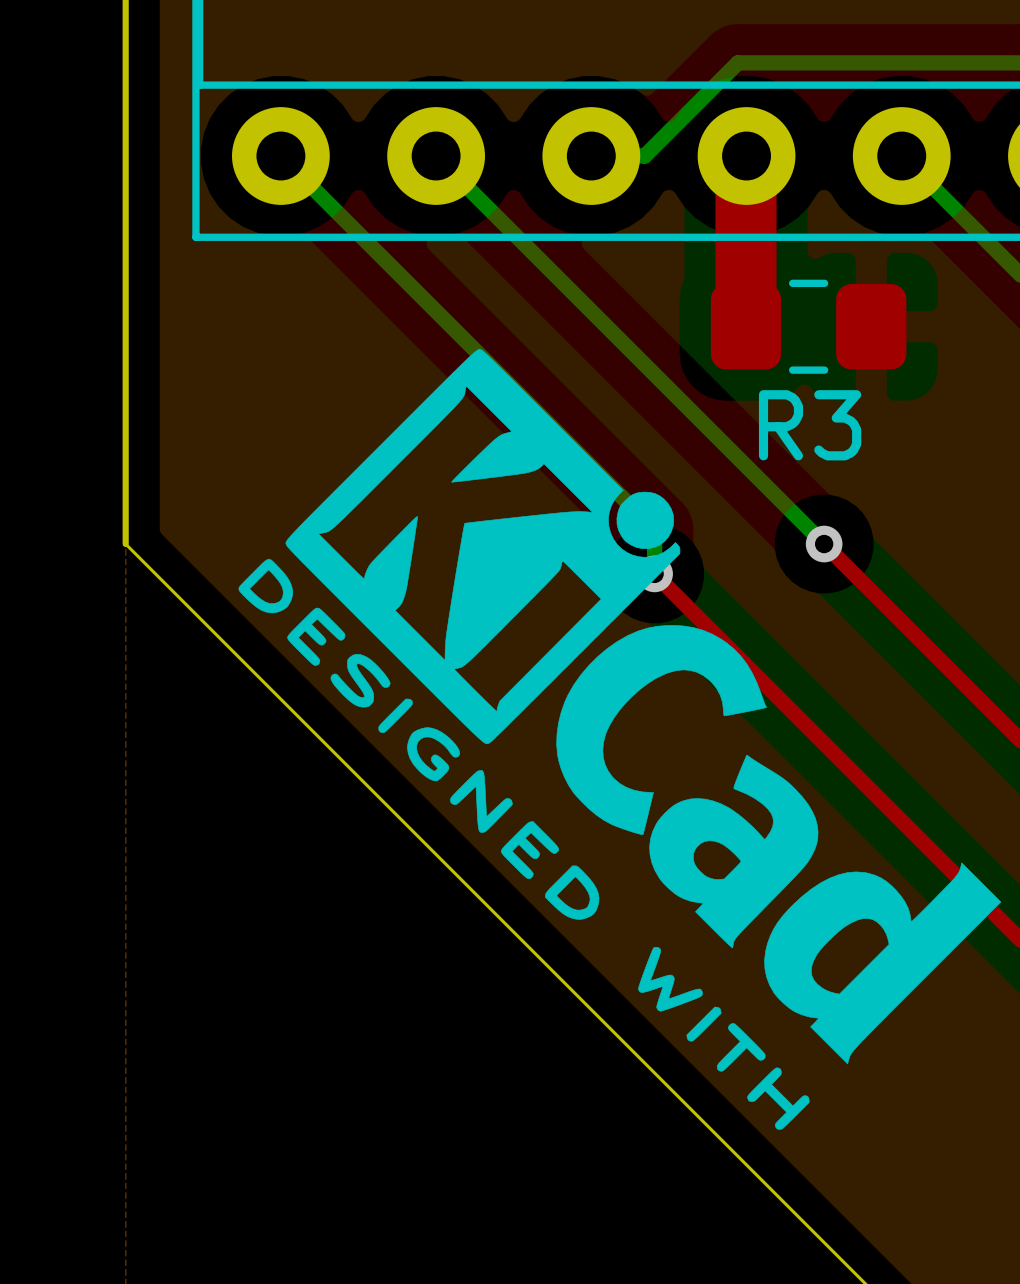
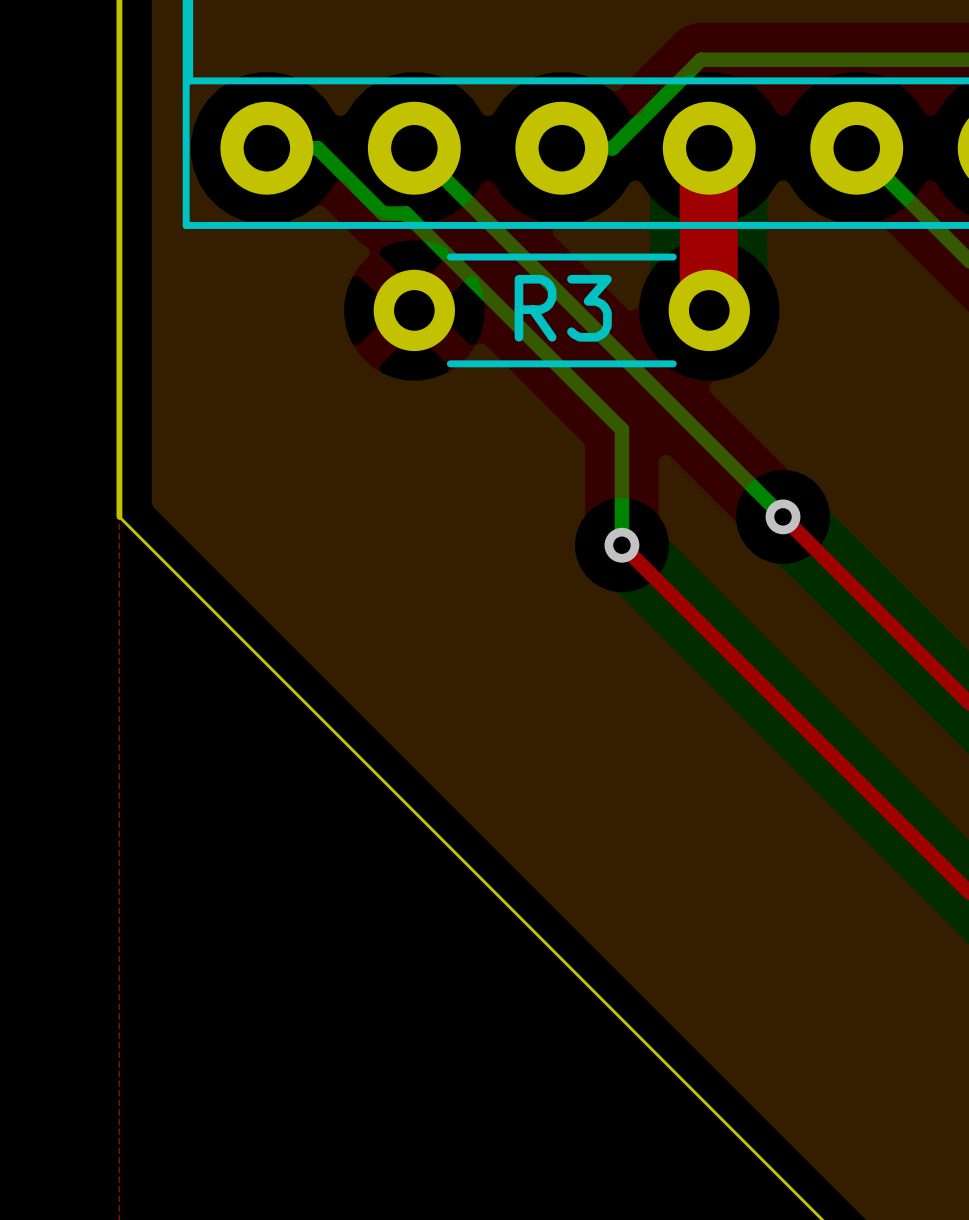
bottom track: (280, 156) (654, 529) -> (266, 148) (317, 148) (382, 213) (405, 213) (621, 429) (621, 503)
R3 footprint: [710, 279, 907, 374] -> [373, 253, 750, 368]
drawing: [238, 349, 1002, 1130] -> none

